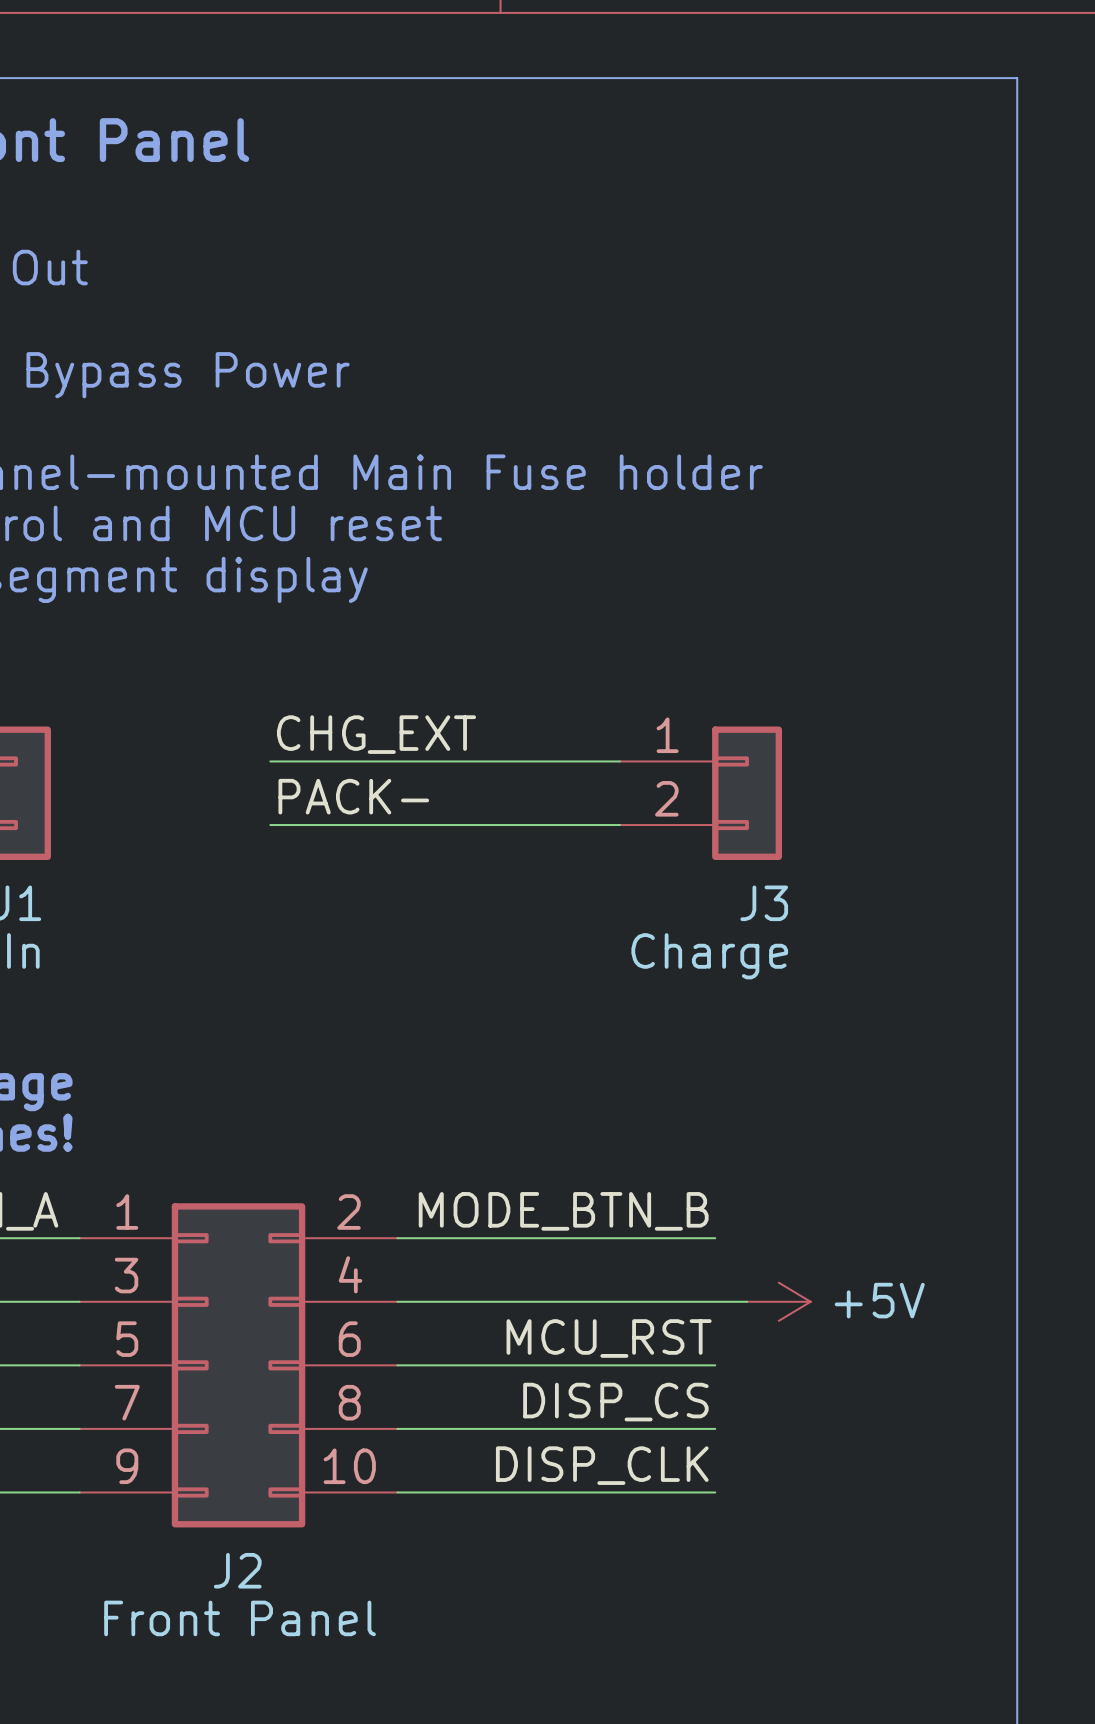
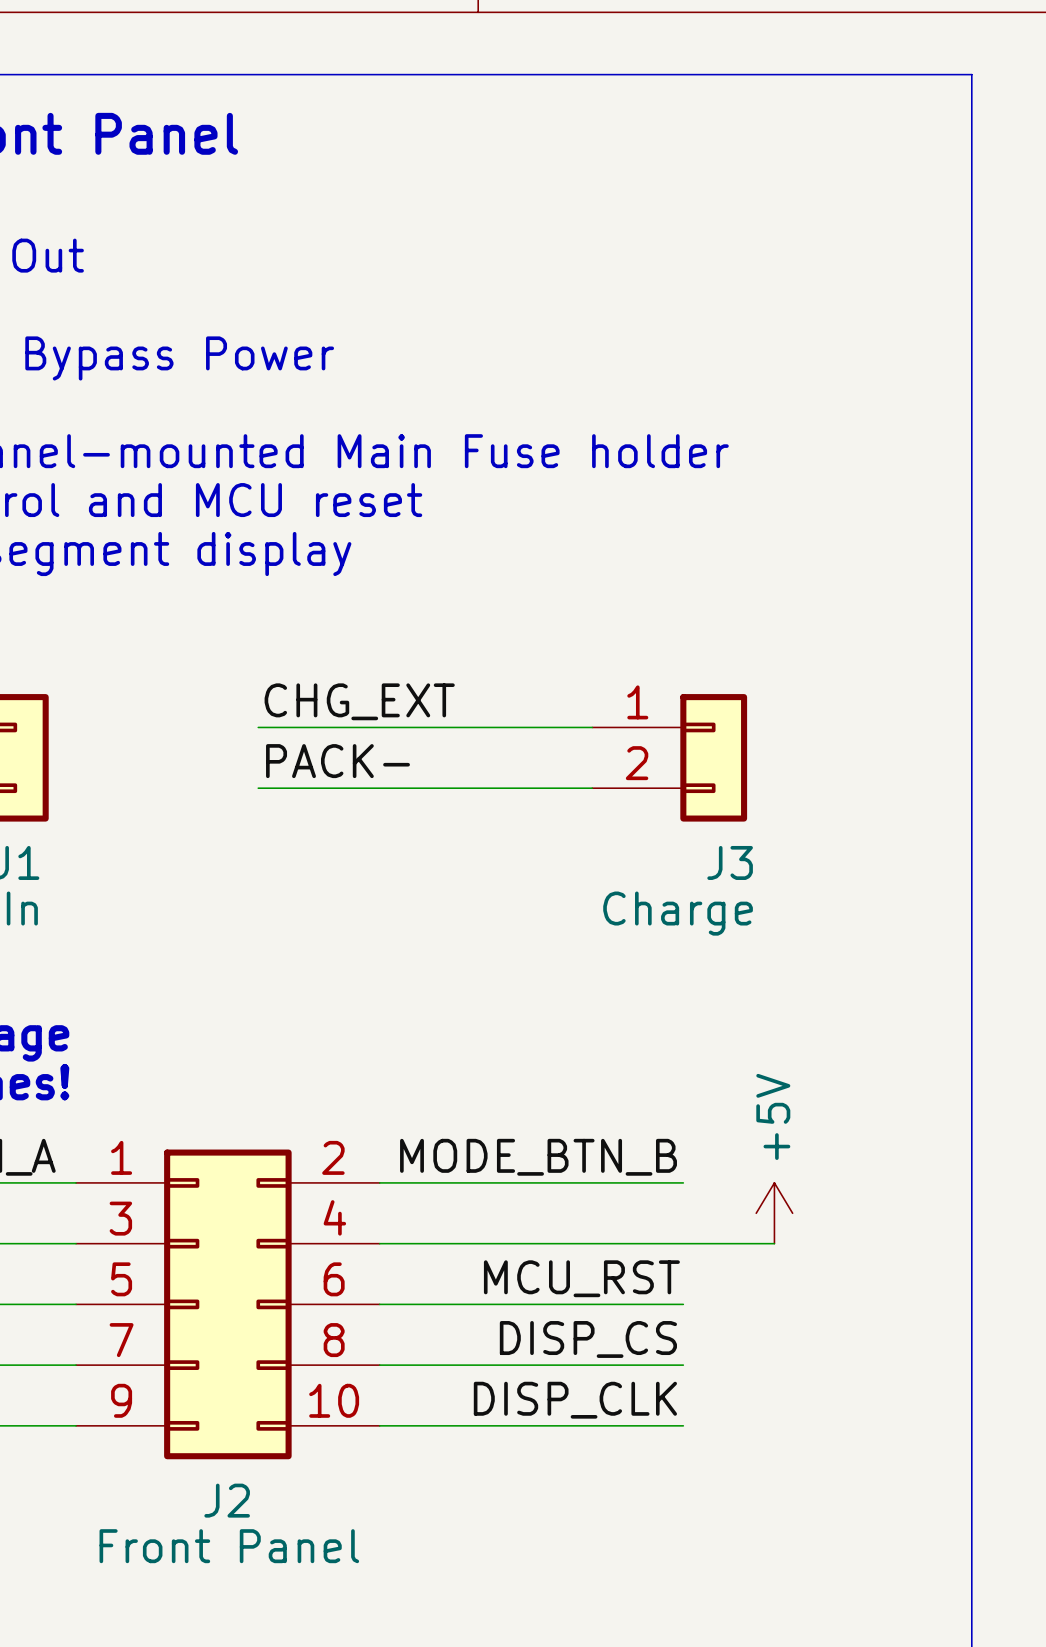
power symbol rotation: 0° (778, 1301) -> 90° counterclockwise (774, 1213)
power symbol position: +5V (778, 1301) -> +5V (774, 1213)

